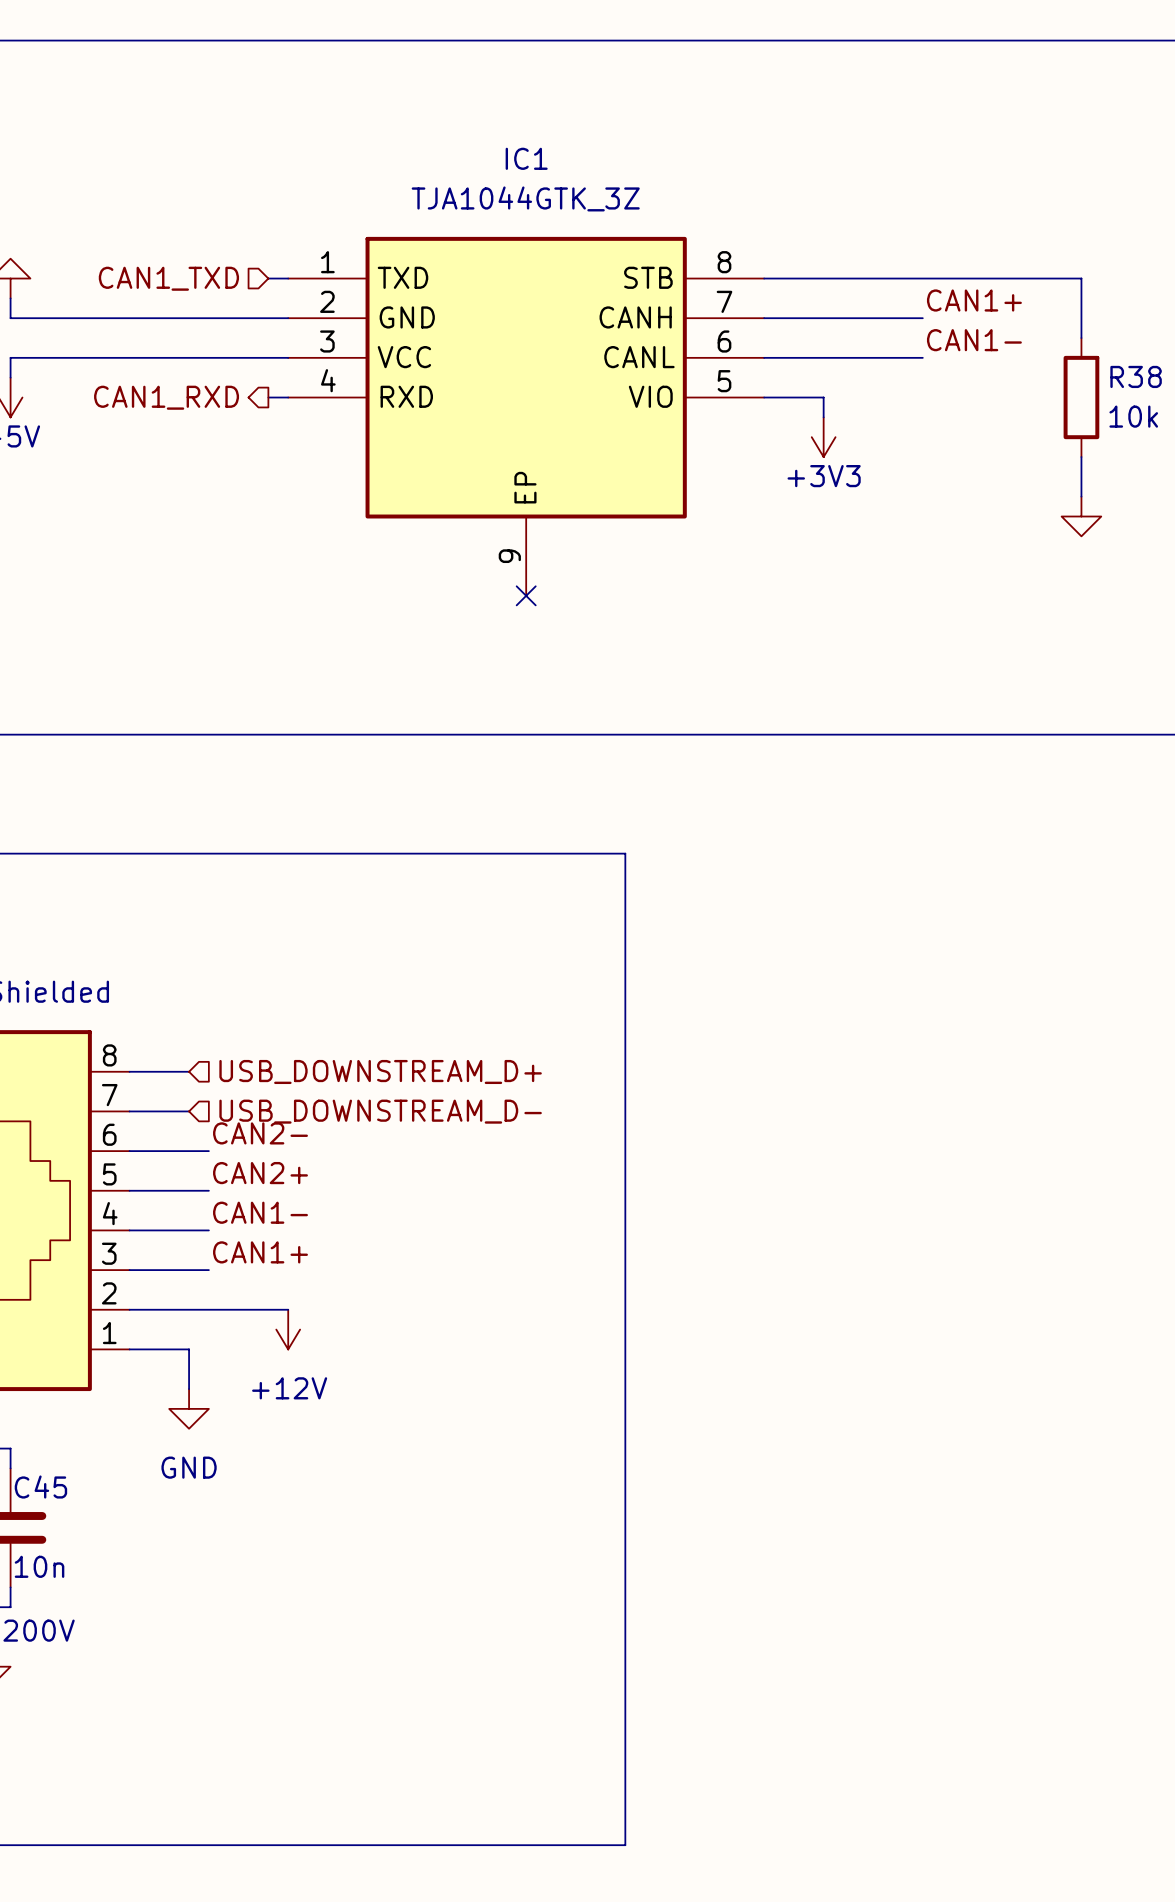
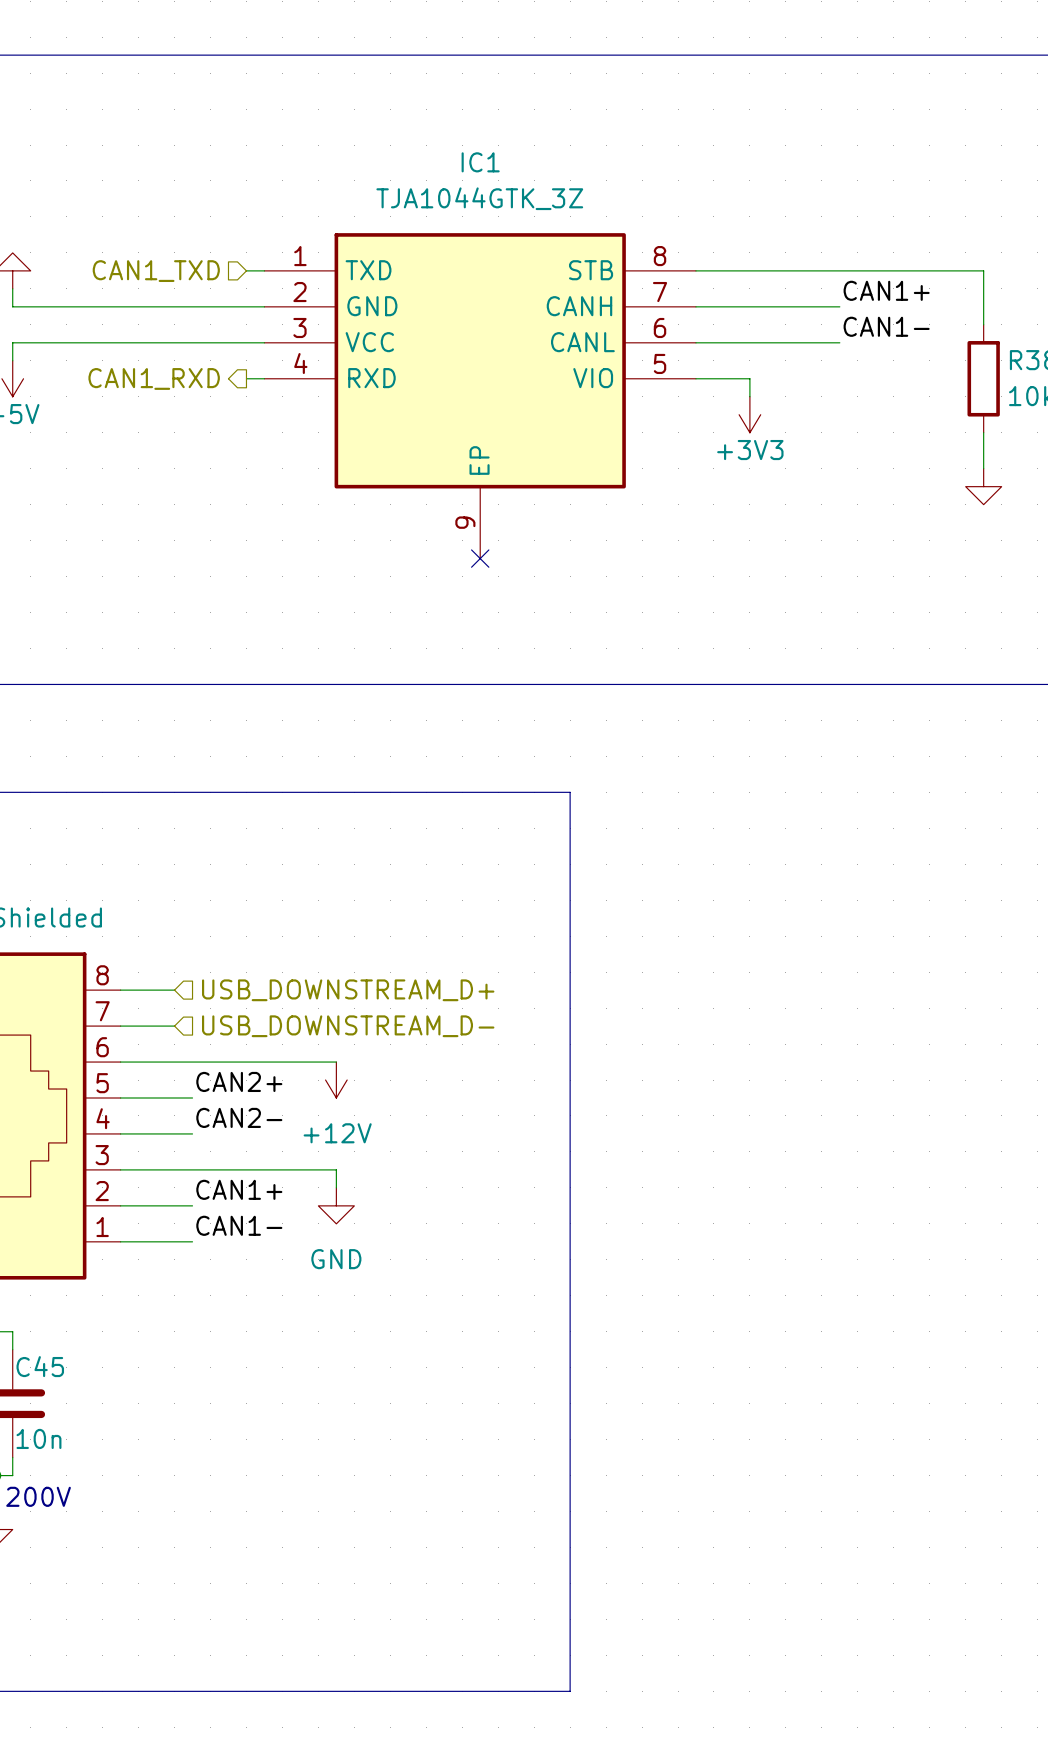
label: CAN2- (260, 1133) -> none
wire: none -> (192, 1062) (336, 1062)
label: CAN1- (260, 1212) -> CAN2- (239, 1117)
label position: CAN1+ (260, 1252) -> CAN1+ (239, 1189)
wire: none -> (192, 1169) (336, 1169) (336, 1187)
wire: (208, 1309) (288, 1309) -> none
power symbol position: +12V (288, 1329) -> +12V (336, 1080)
label: none -> CAN1- (239, 1225)
wire: (189, 1349) (189, 1389) -> (174, 1241) (192, 1241)
power symbol position: GND (189, 1408) -> GND (336, 1205)

